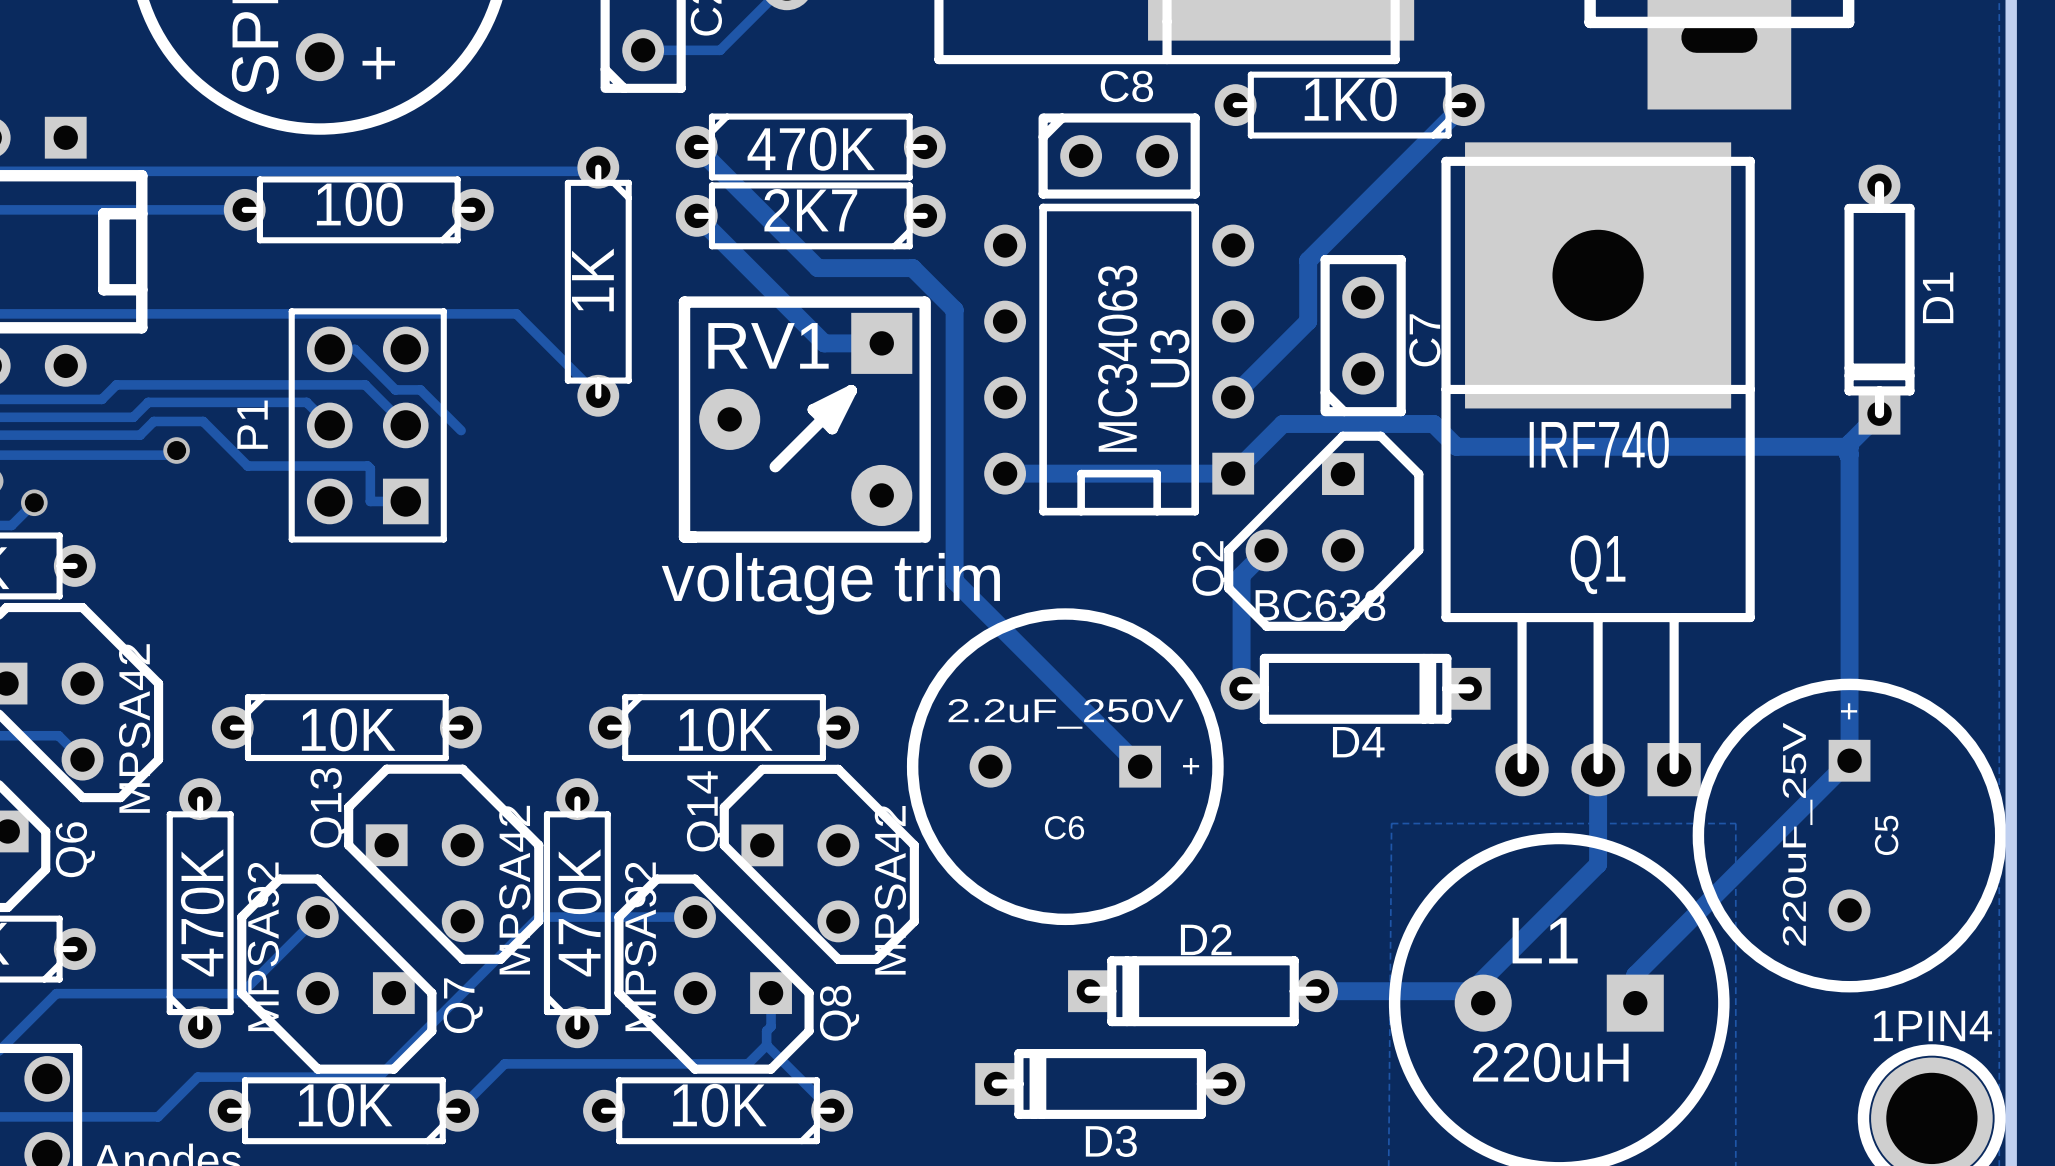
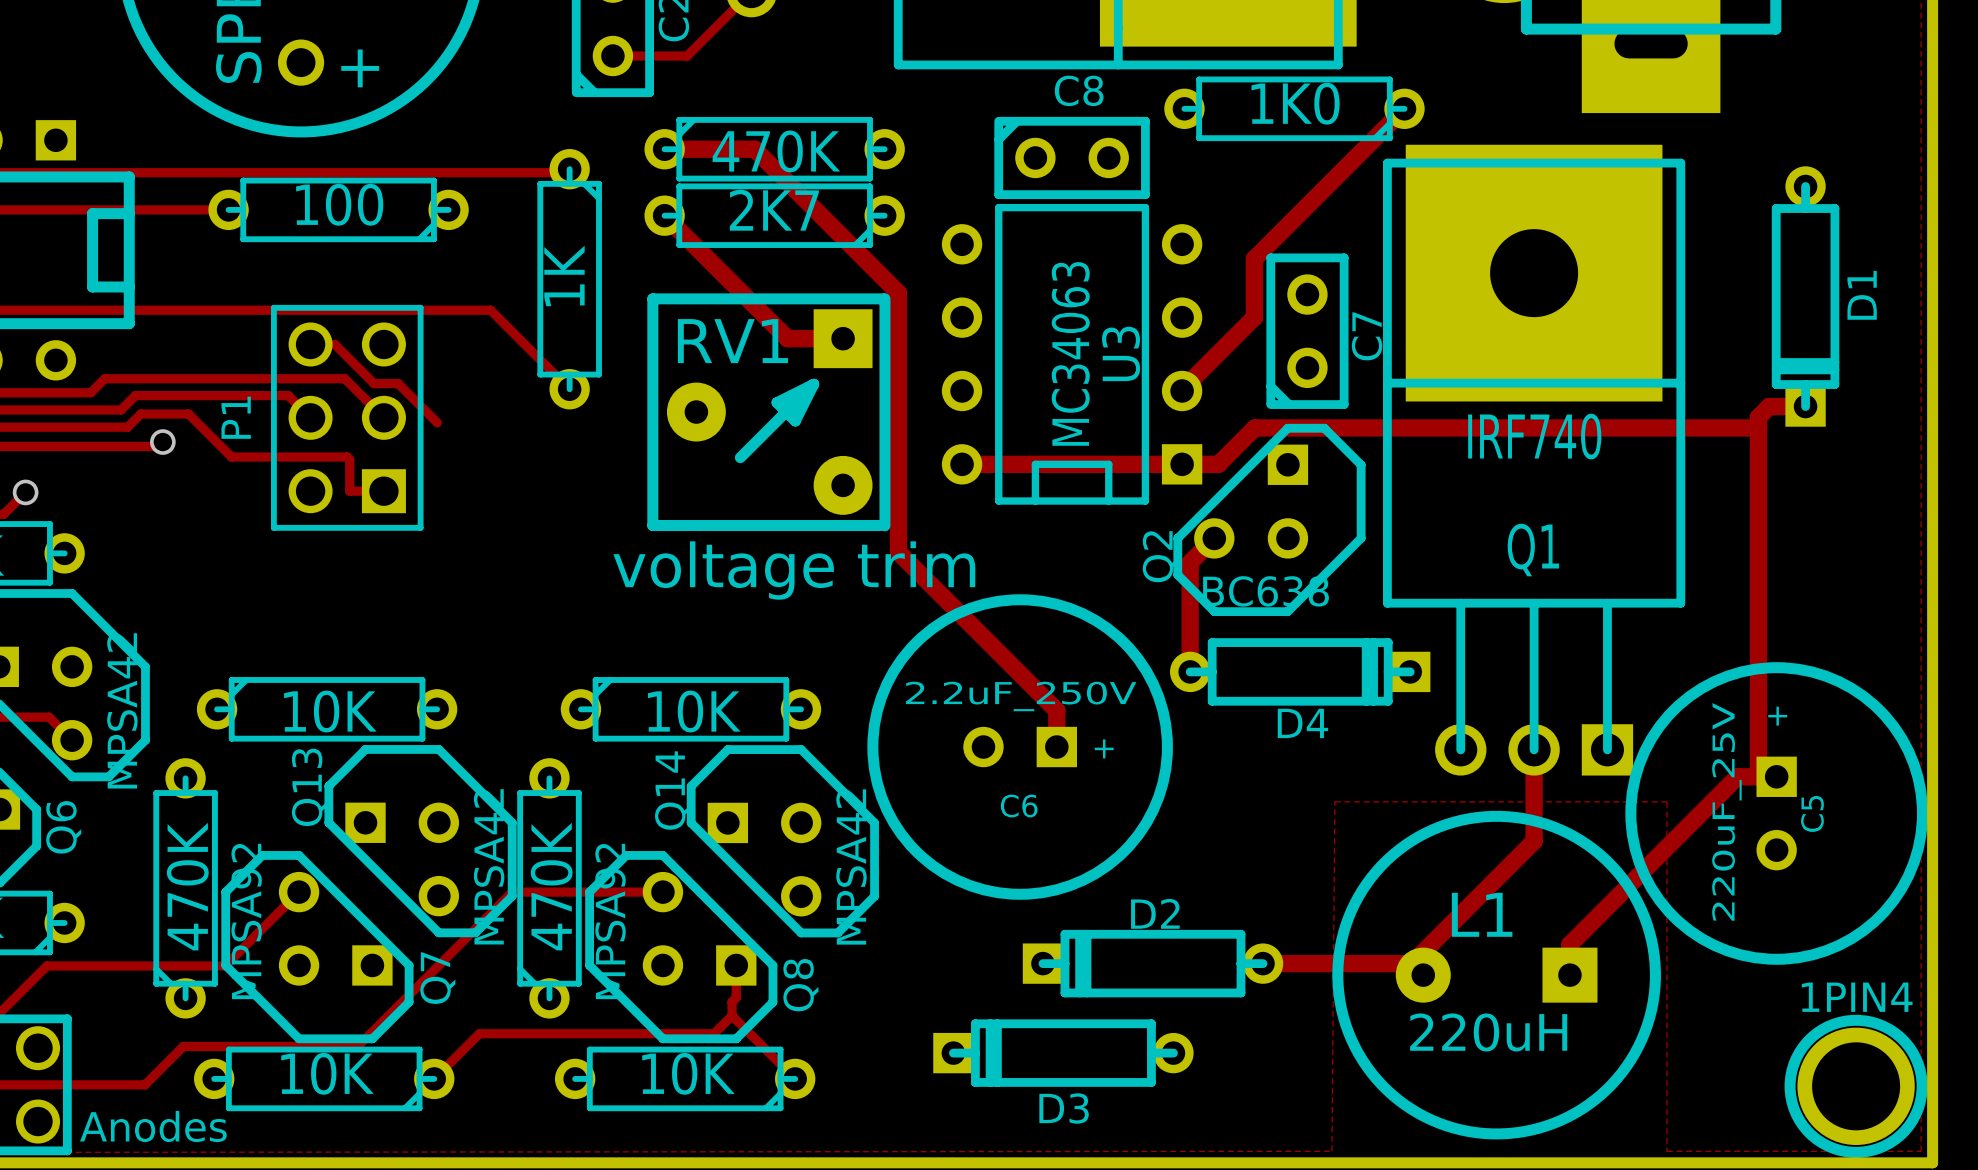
track: (696, 146) (817, 268) (912, 268) (954, 309) (954, 581) (1140, 766) -> (664, 149) (754, 149) (898, 292) (898, 552) (1056, 710) (1056, 747)
track: (1879, 413) (1849, 443) (1849, 760) (1635, 975) -> (1805, 406) (1769, 406) (1758, 417) (1758, 776)
track: (1849, 454) (1848, 454) (1849, 446) (1456, 446) (1433, 423) (1282, 423) (1233, 473) -> (1758, 427) (1254, 427) (1218, 464) (1182, 464)
C6 footprint: [906, 608, 1224, 926] -> [867, 594, 1173, 900]
C5 footprint: [1692, 678, 2007, 993] -> [1625, 662, 1928, 965]
track: none -> (1776, 776) (1737, 776) (1569, 944) (1569, 948)

